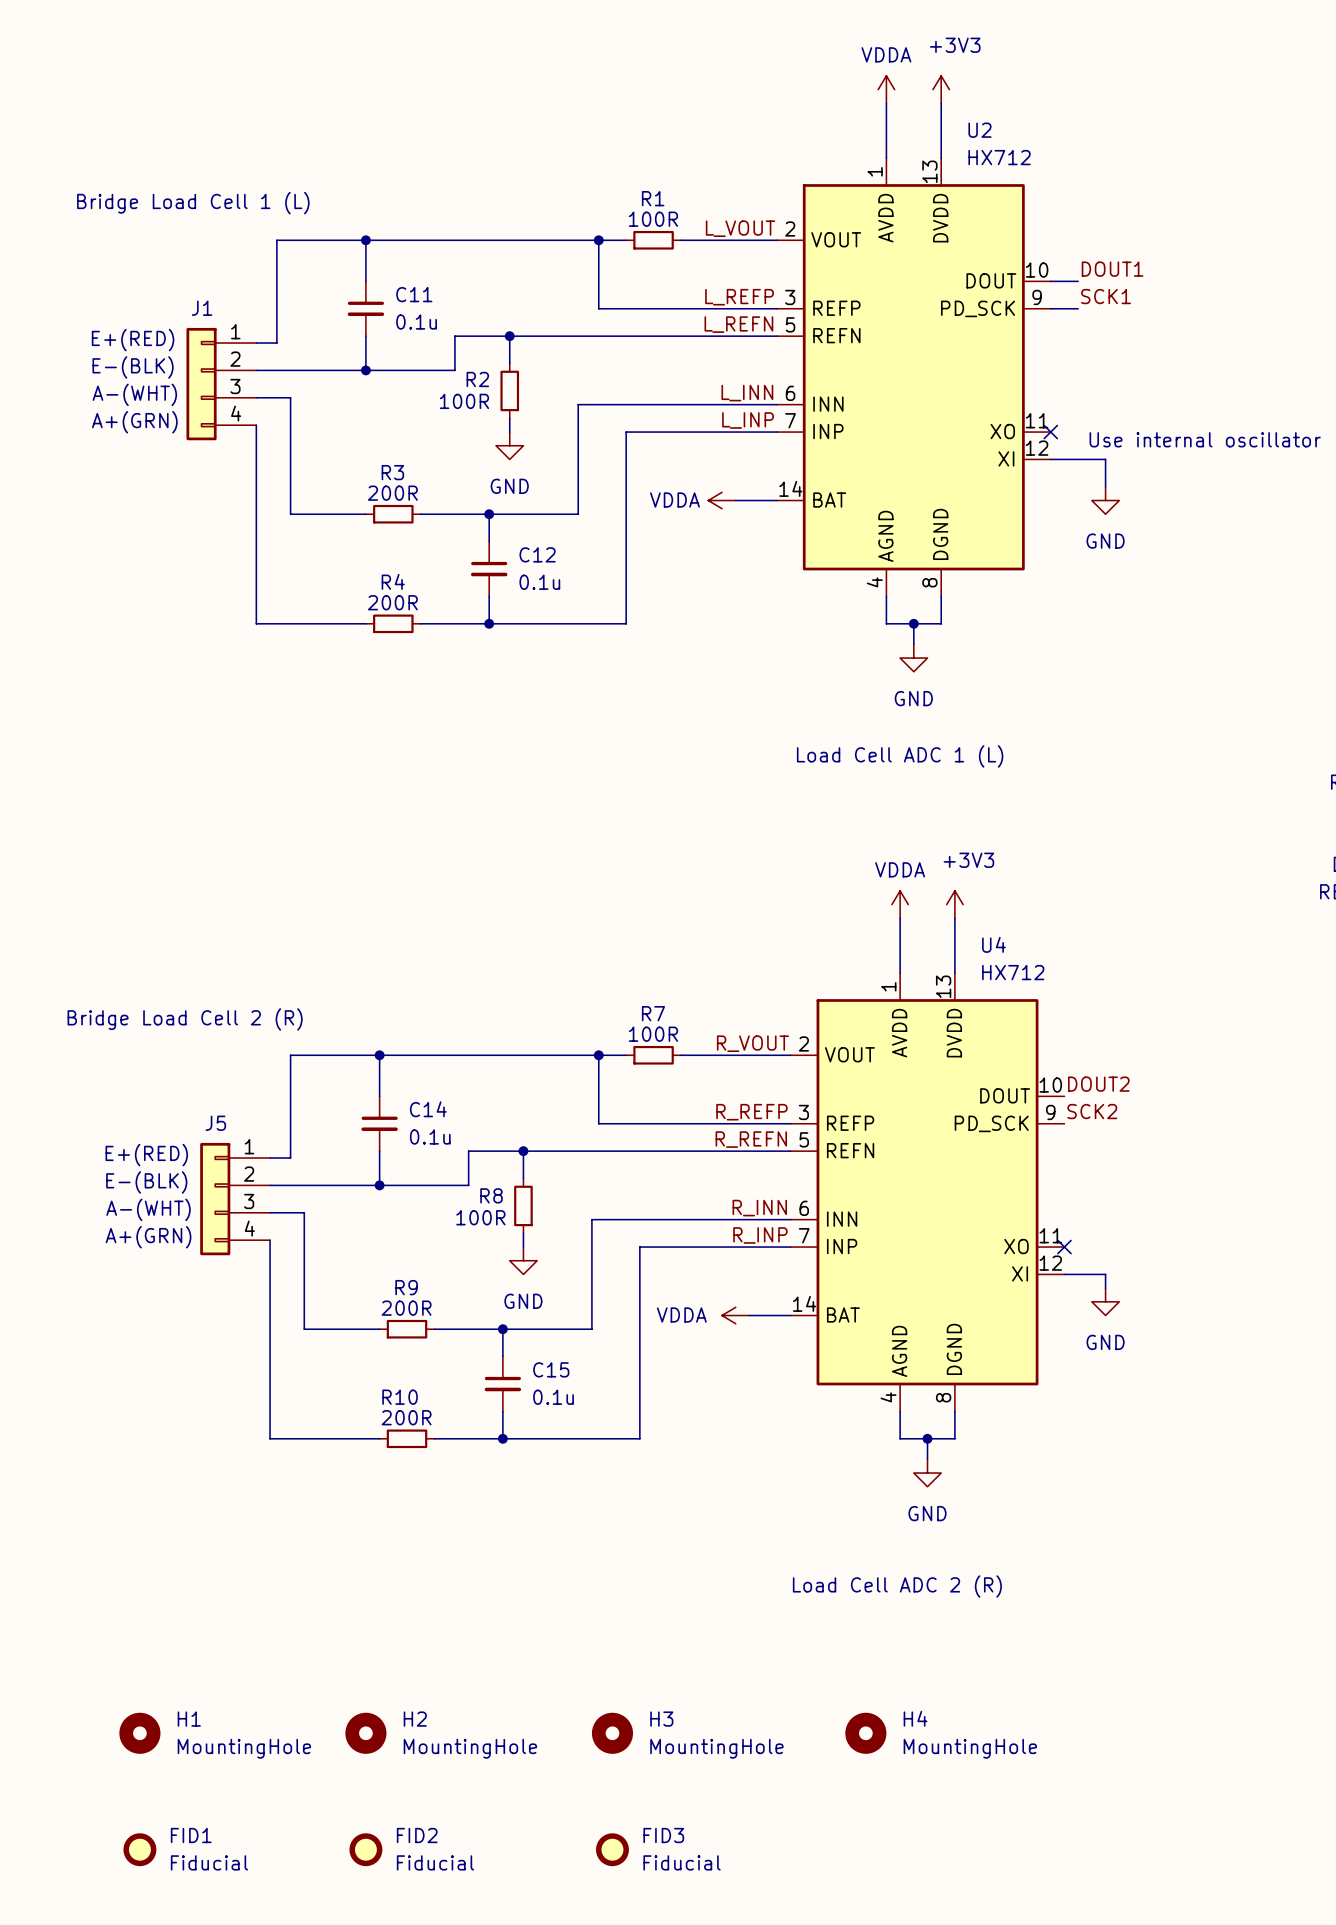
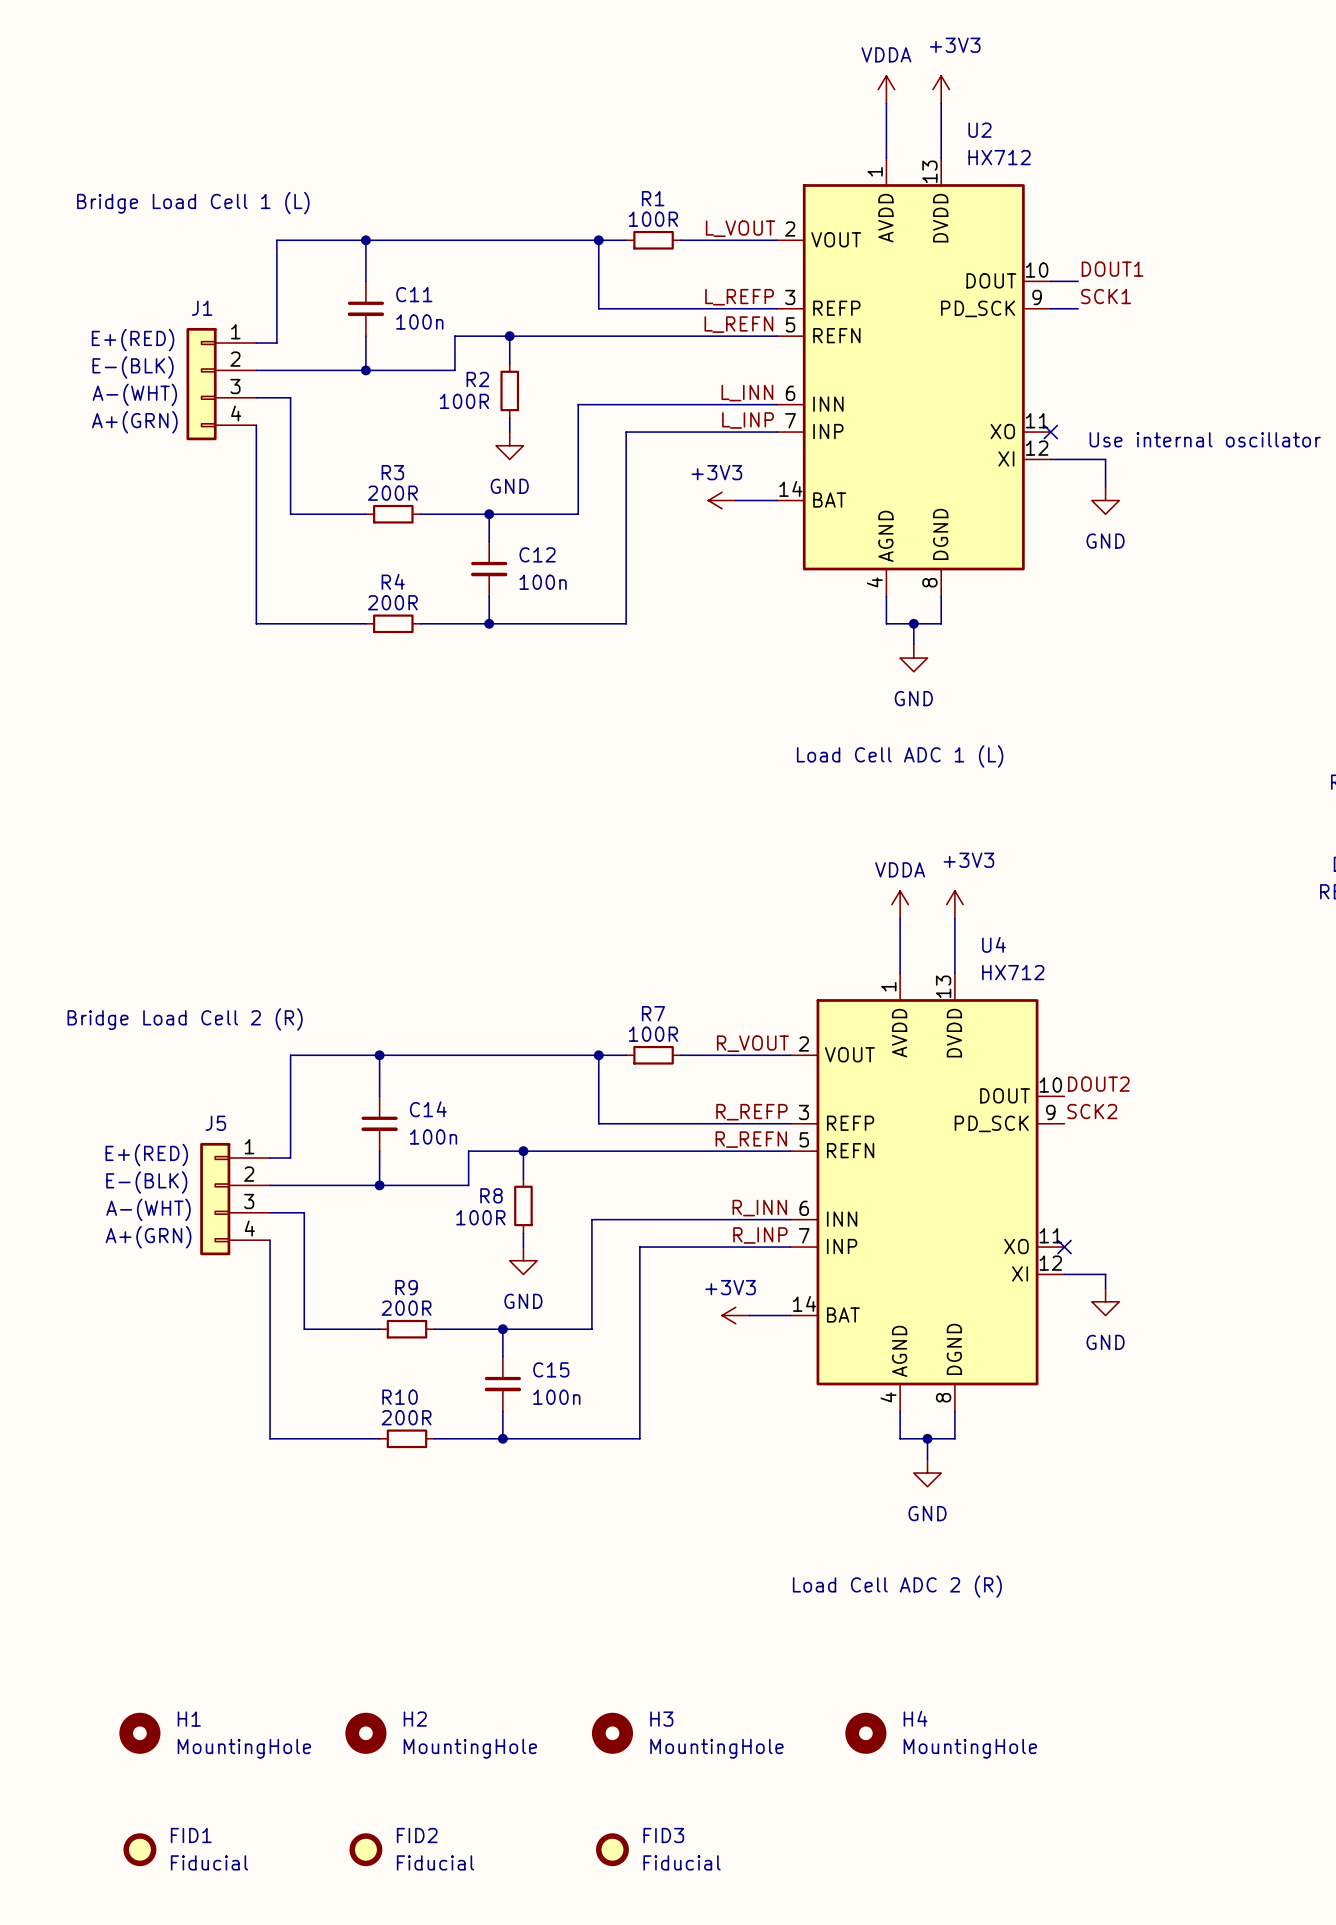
C11 value: 0.1u (416, 322) -> 100n (419, 322)
power symbol: VDDA (722, 500) -> +3V3 (722, 500)
C12 value: 0.1u (539, 582) -> 100n (543, 582)
C14 value: 0.1u (430, 1137) -> 100n (433, 1137)
power symbol: VDDA (735, 1315) -> +3V3 (735, 1315)
C15 value: 0.1u (553, 1397) -> 100n (556, 1397)

